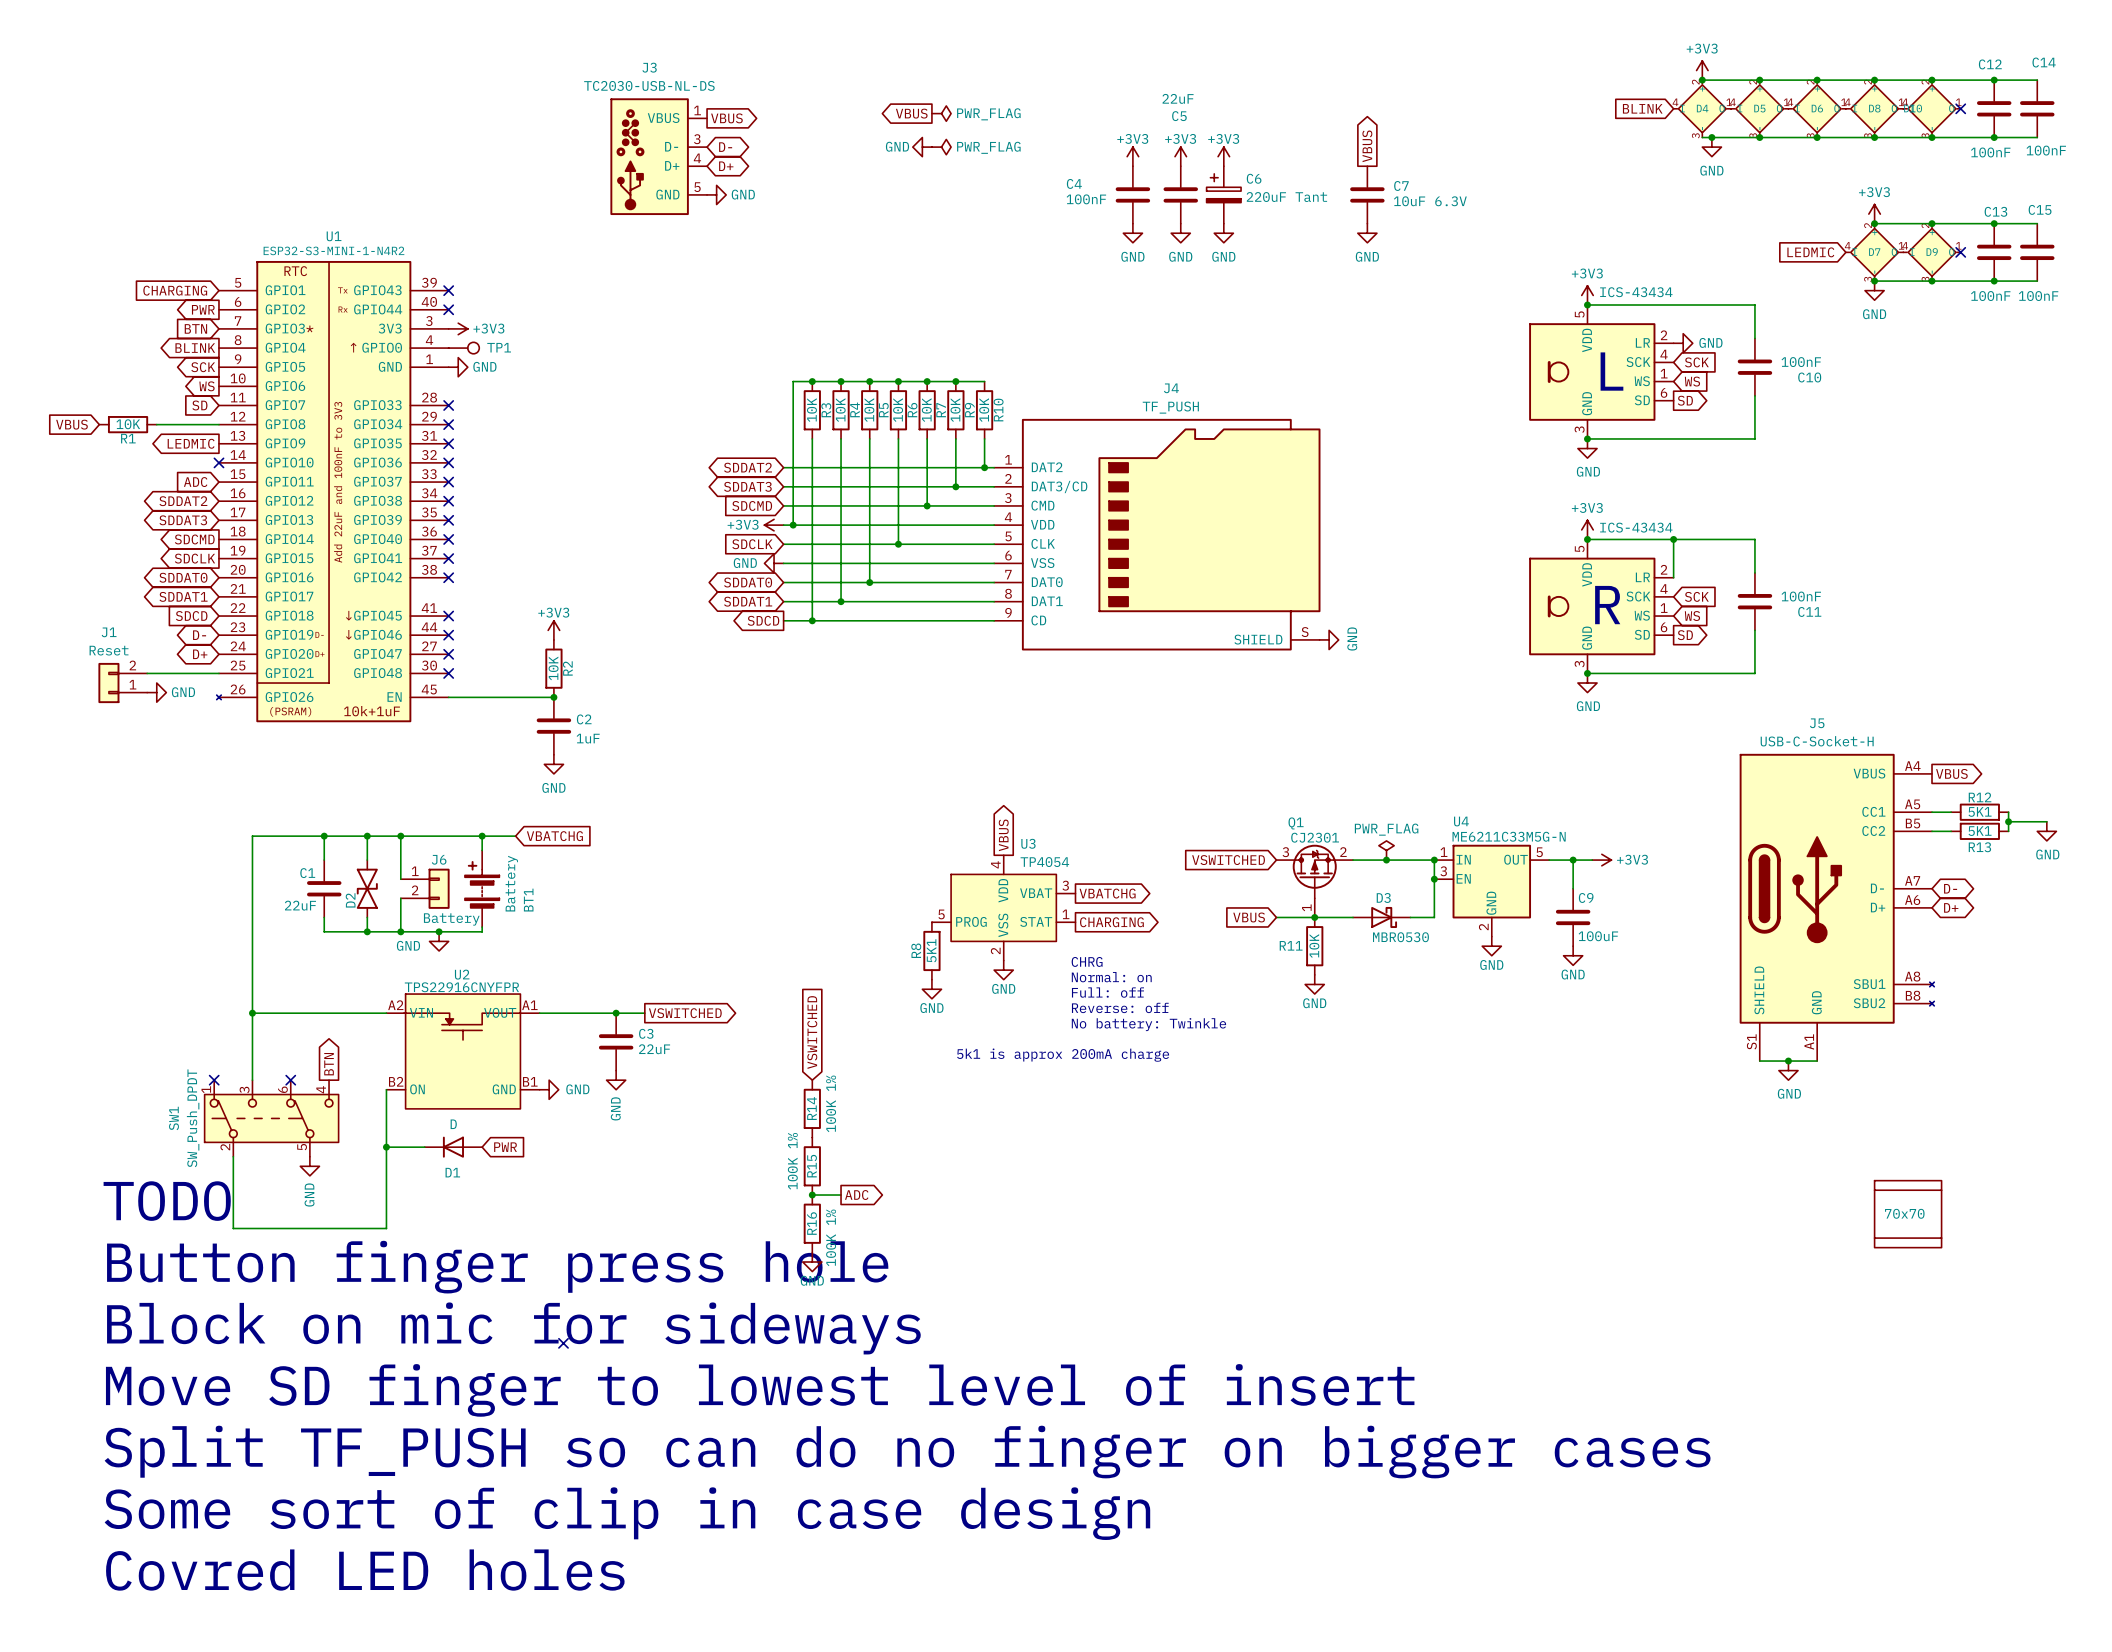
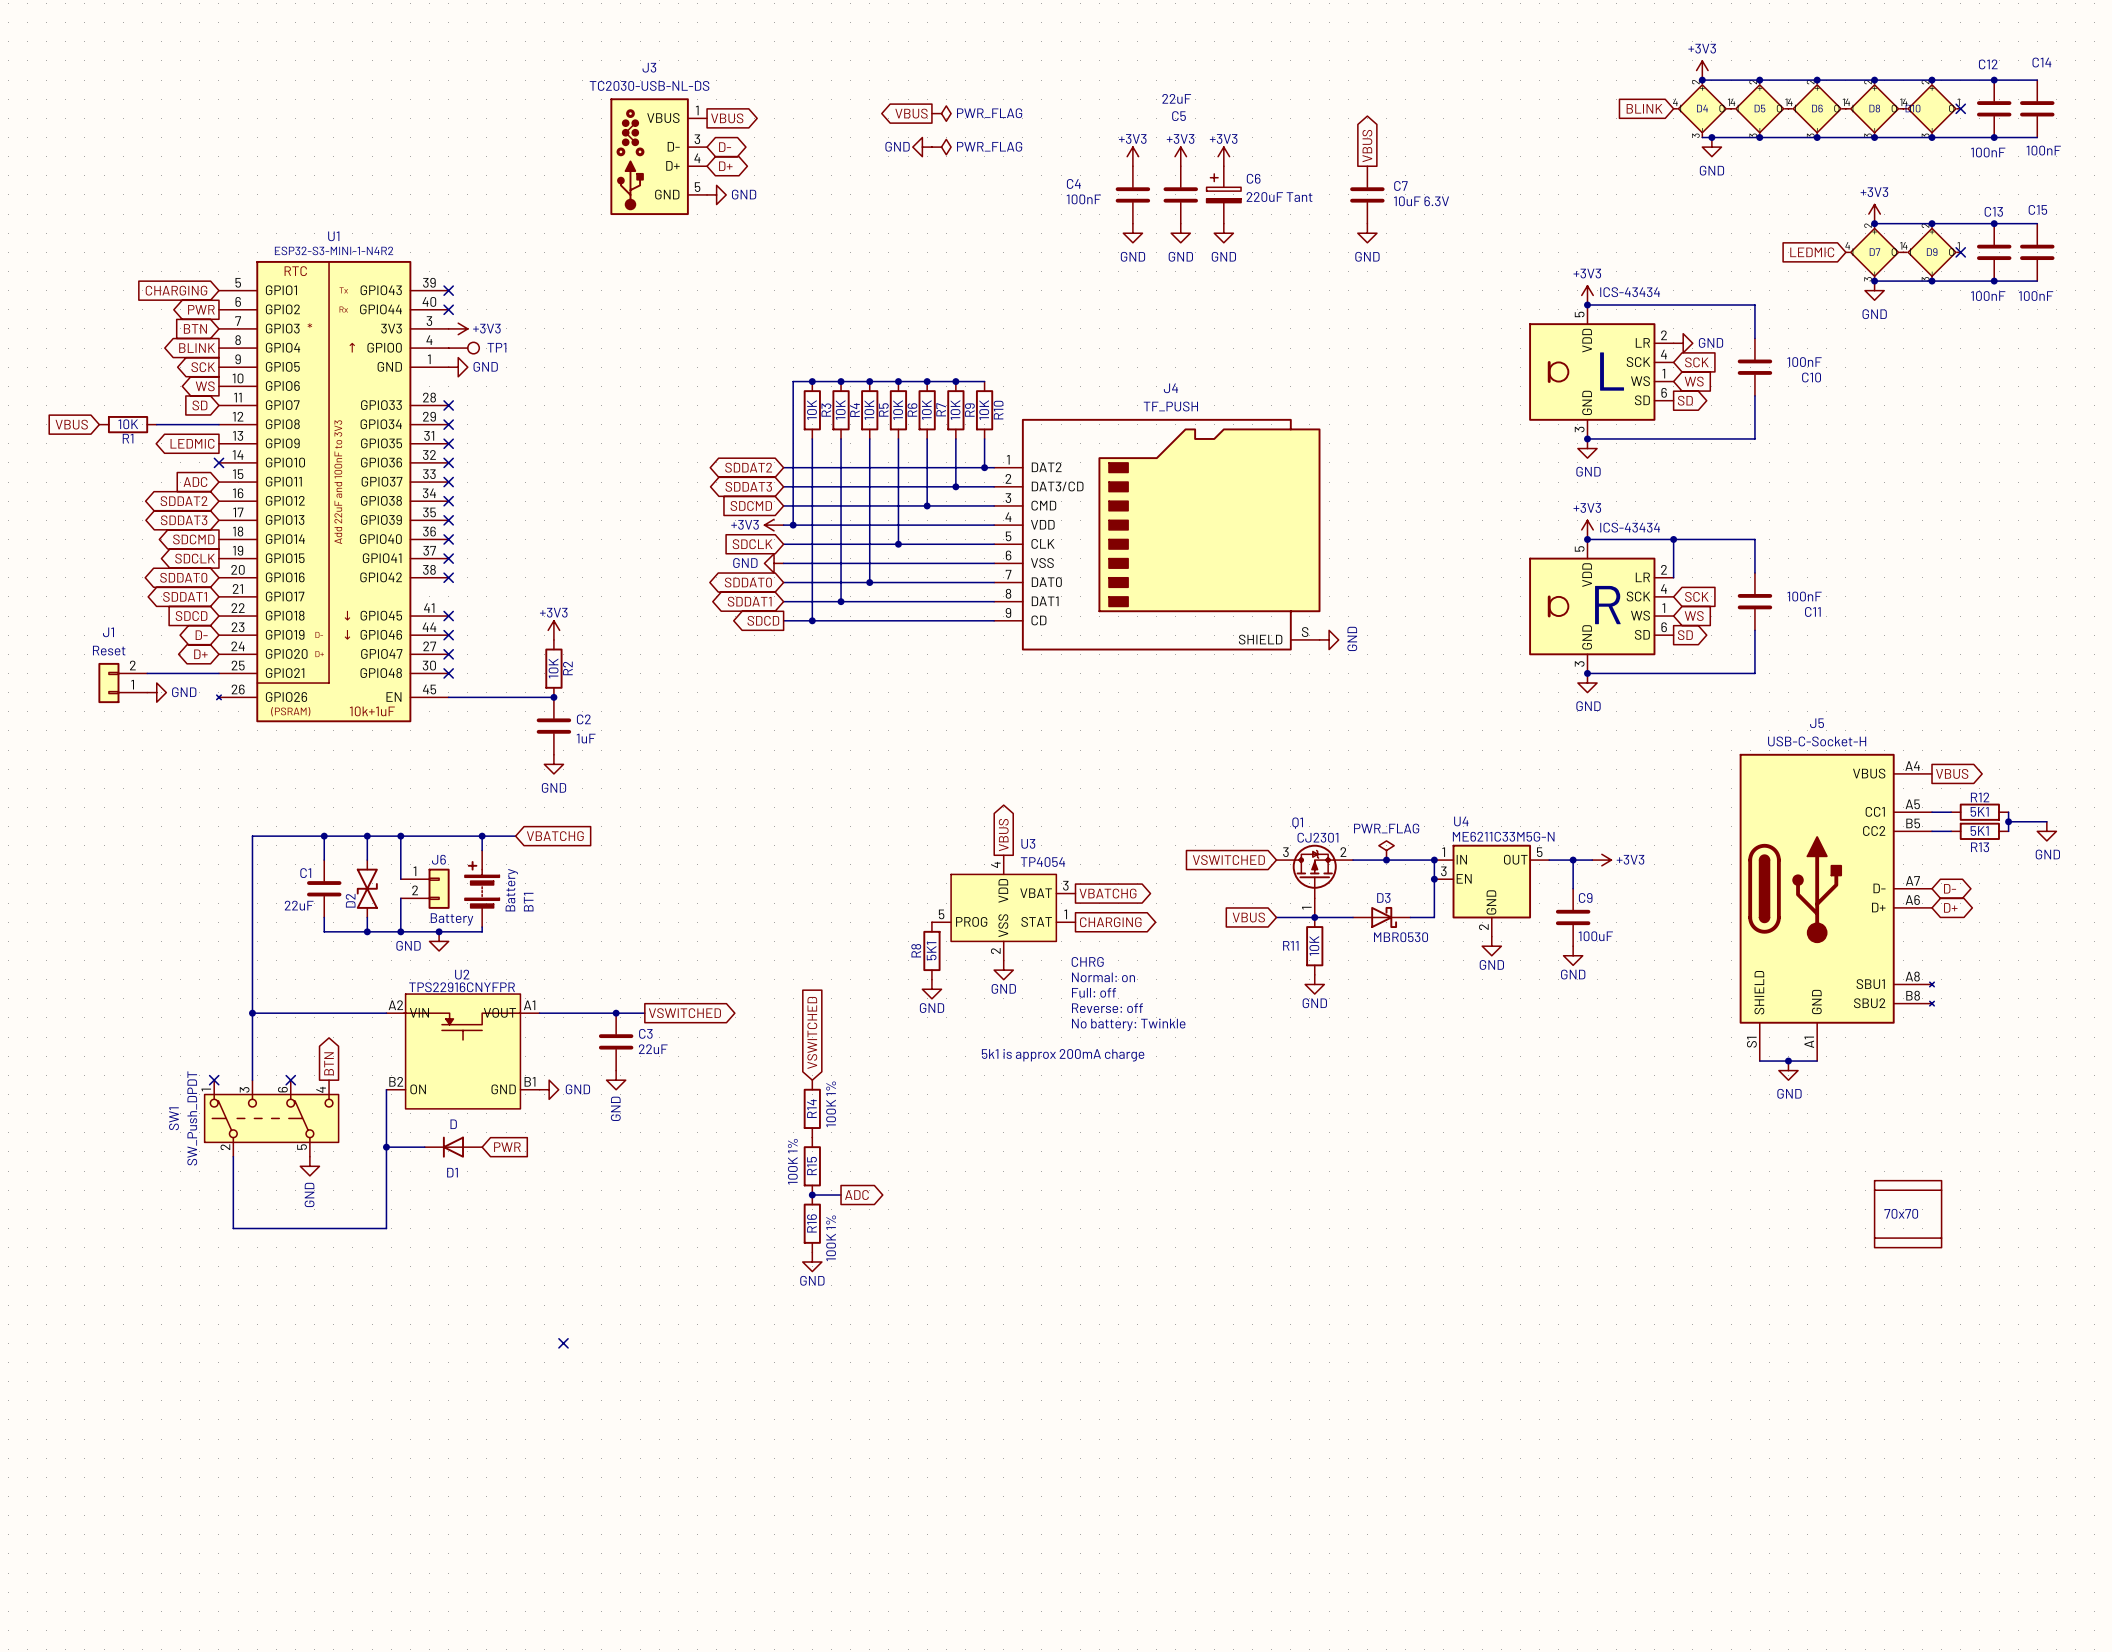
text: TODO (167, 1201) -> none
text: Button finger press hole (497, 1267) -> none
text: Block on mic for sideways (513, 1328) -> none
text: Move SD finger to lowest level of insert (760, 1390) -> none
text: Split TF_PUSH so can do no finger on bigger cases (907, 1452) -> none
text: Some sort of clip in case design (627, 1513) -> none
text: Covred LED holes (365, 1570) -> none

